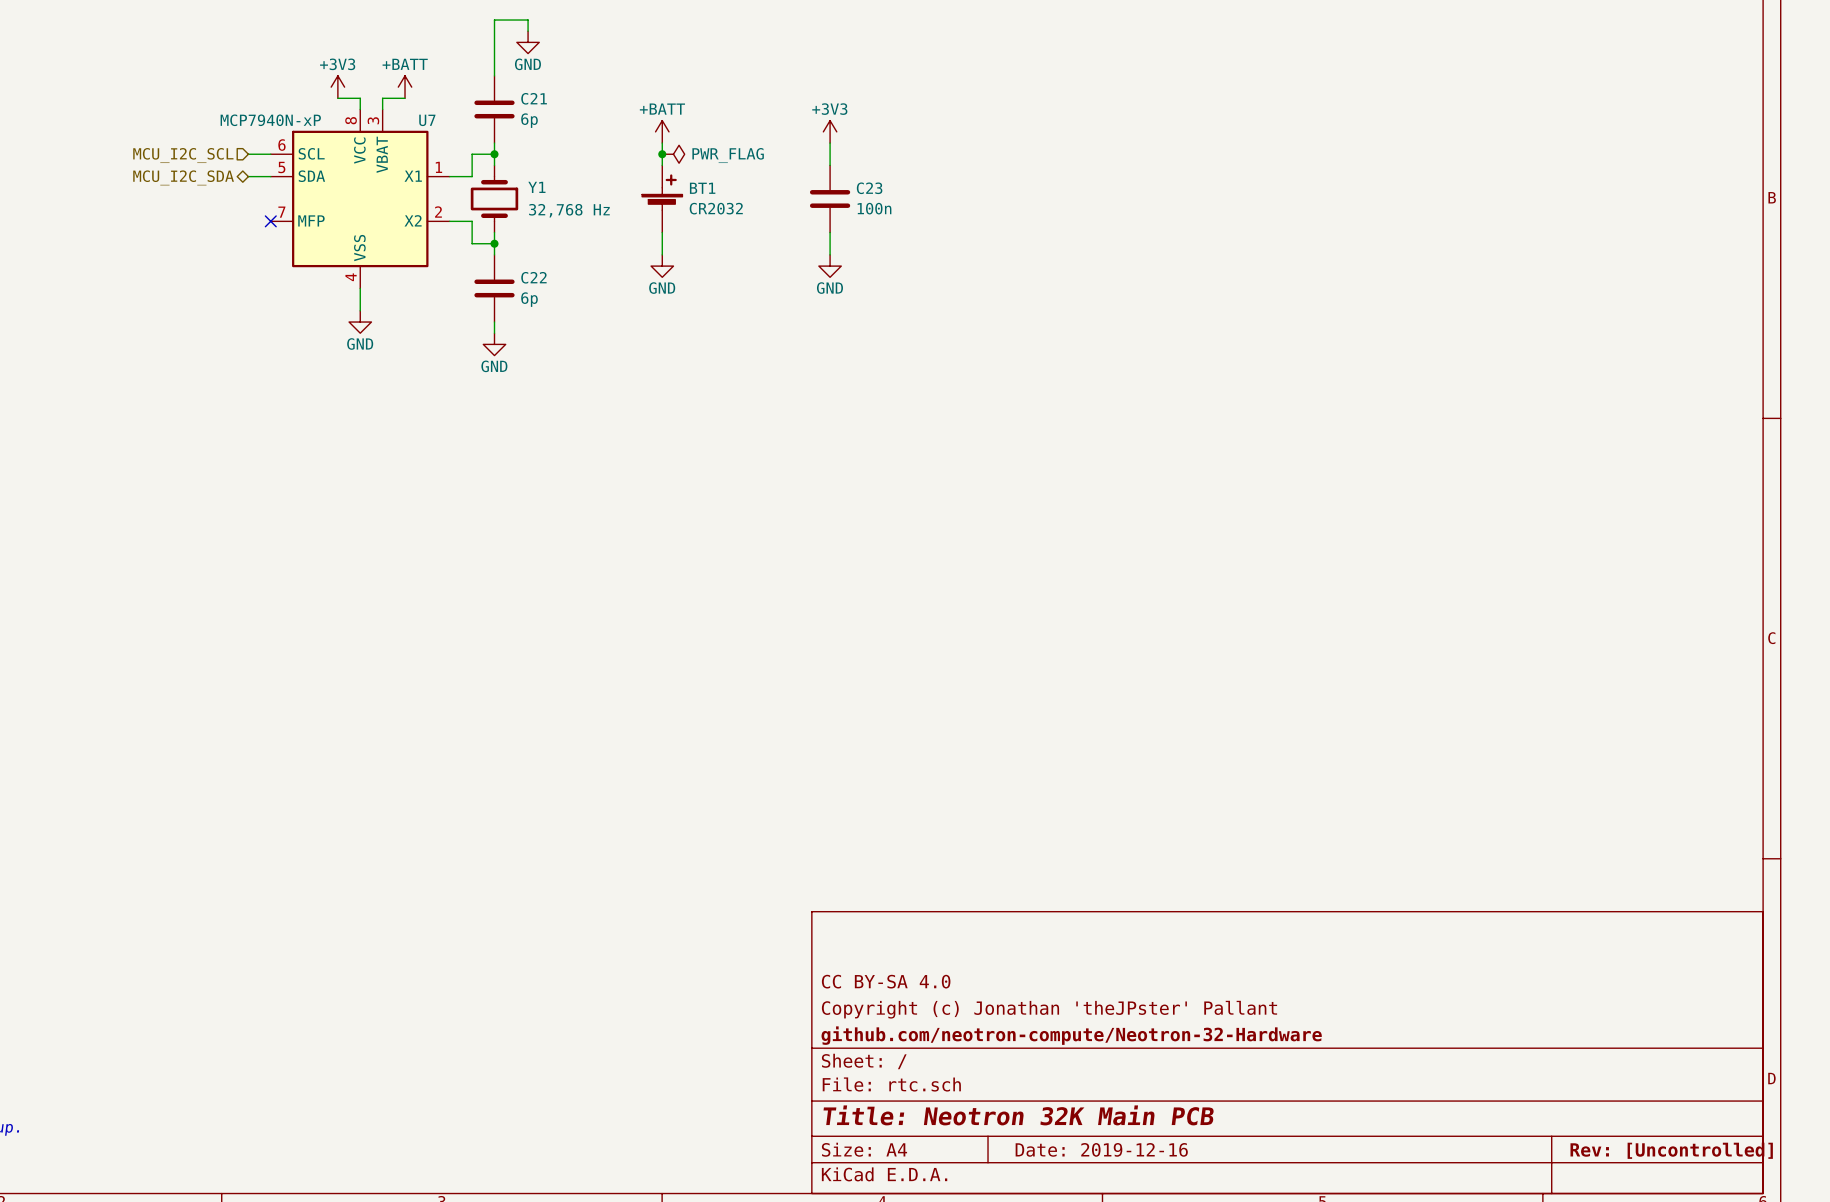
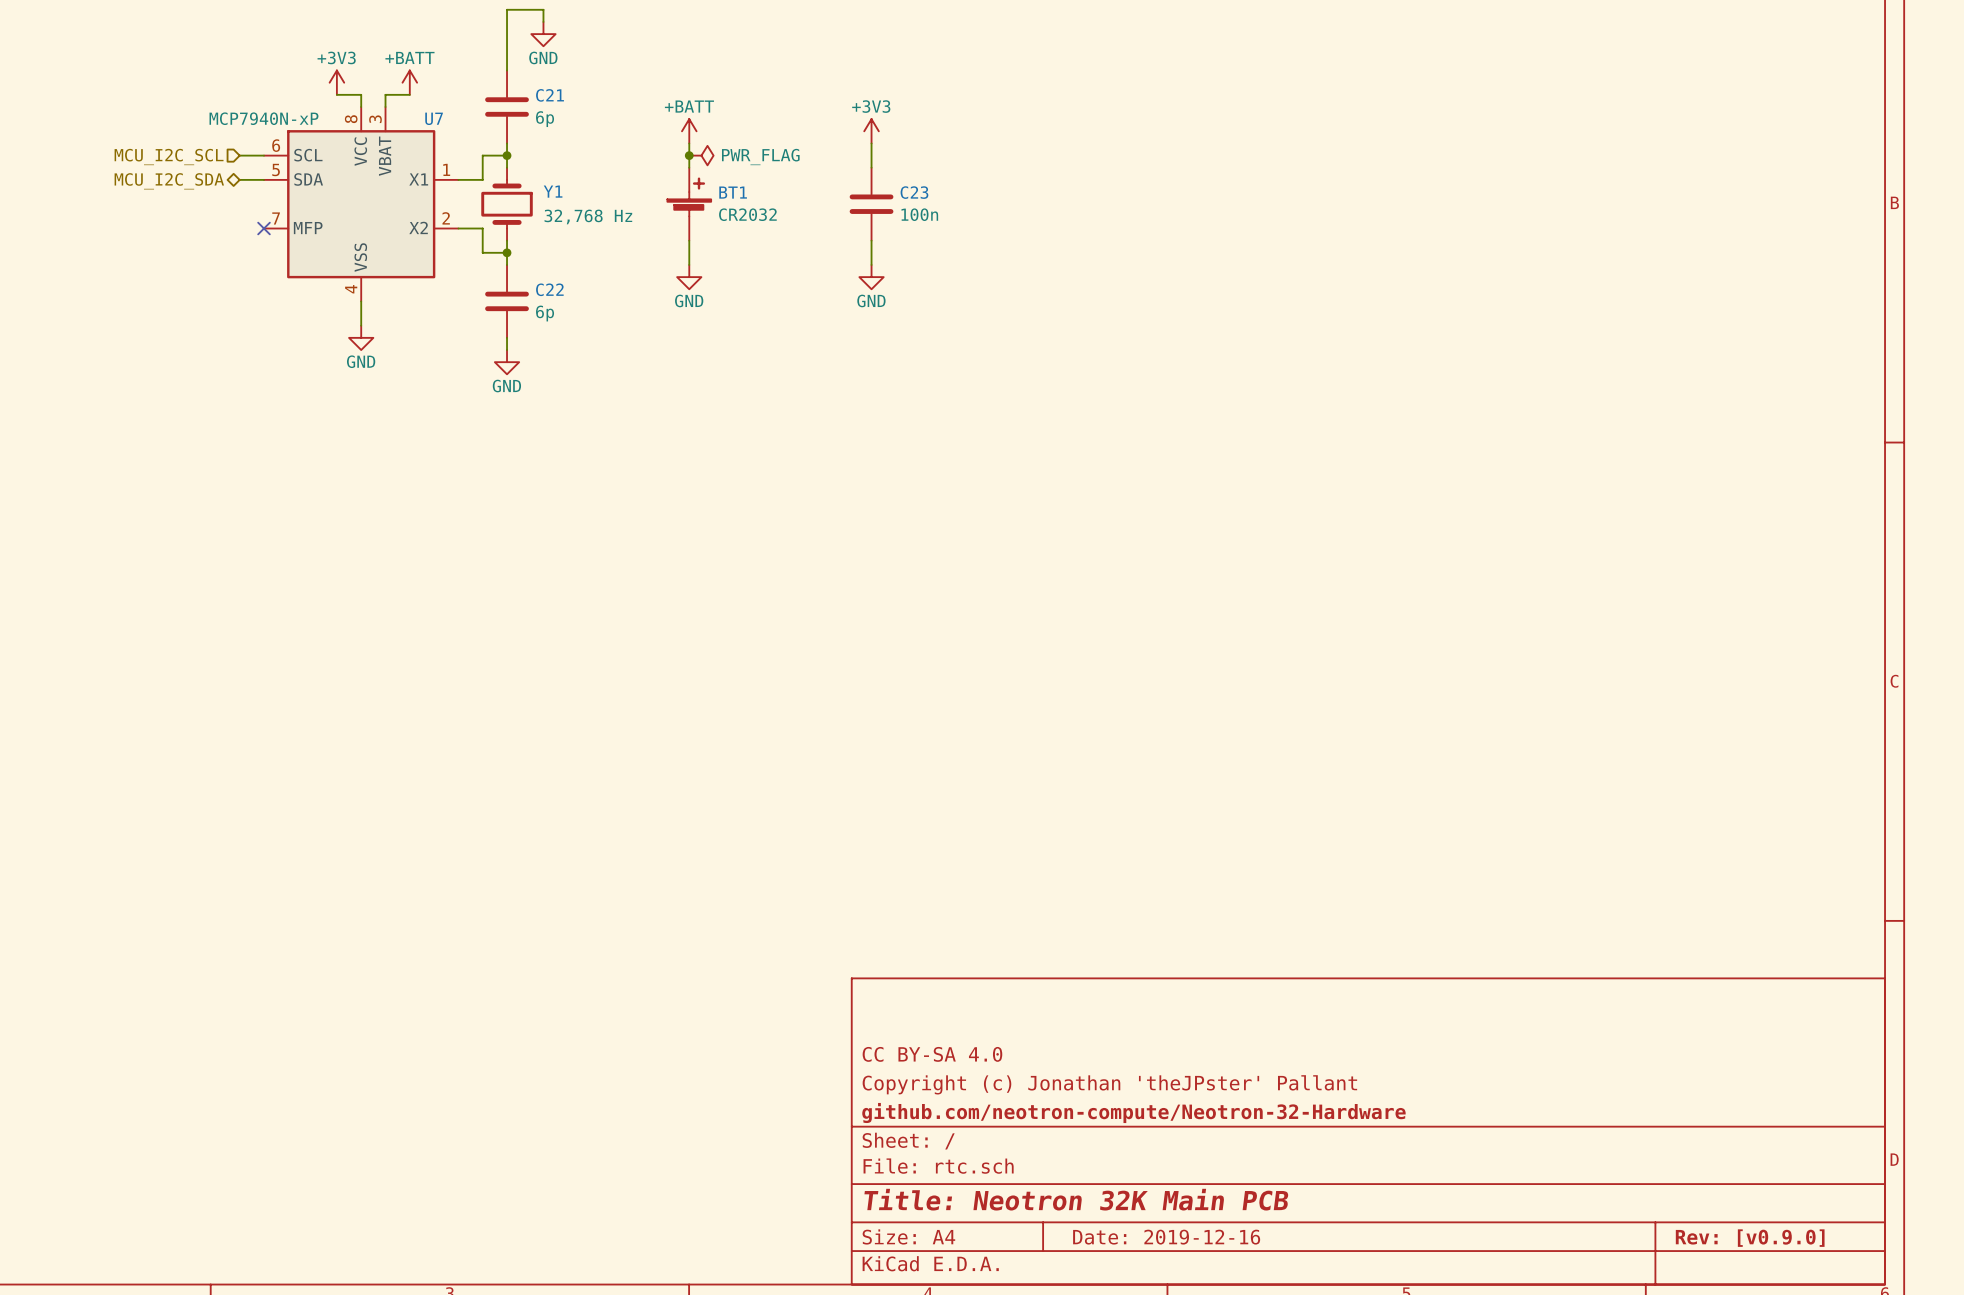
title block: Rev: [Uncontrolled] (1671, 1150) -> Rev: [v0.9.0] (1750, 1238)

